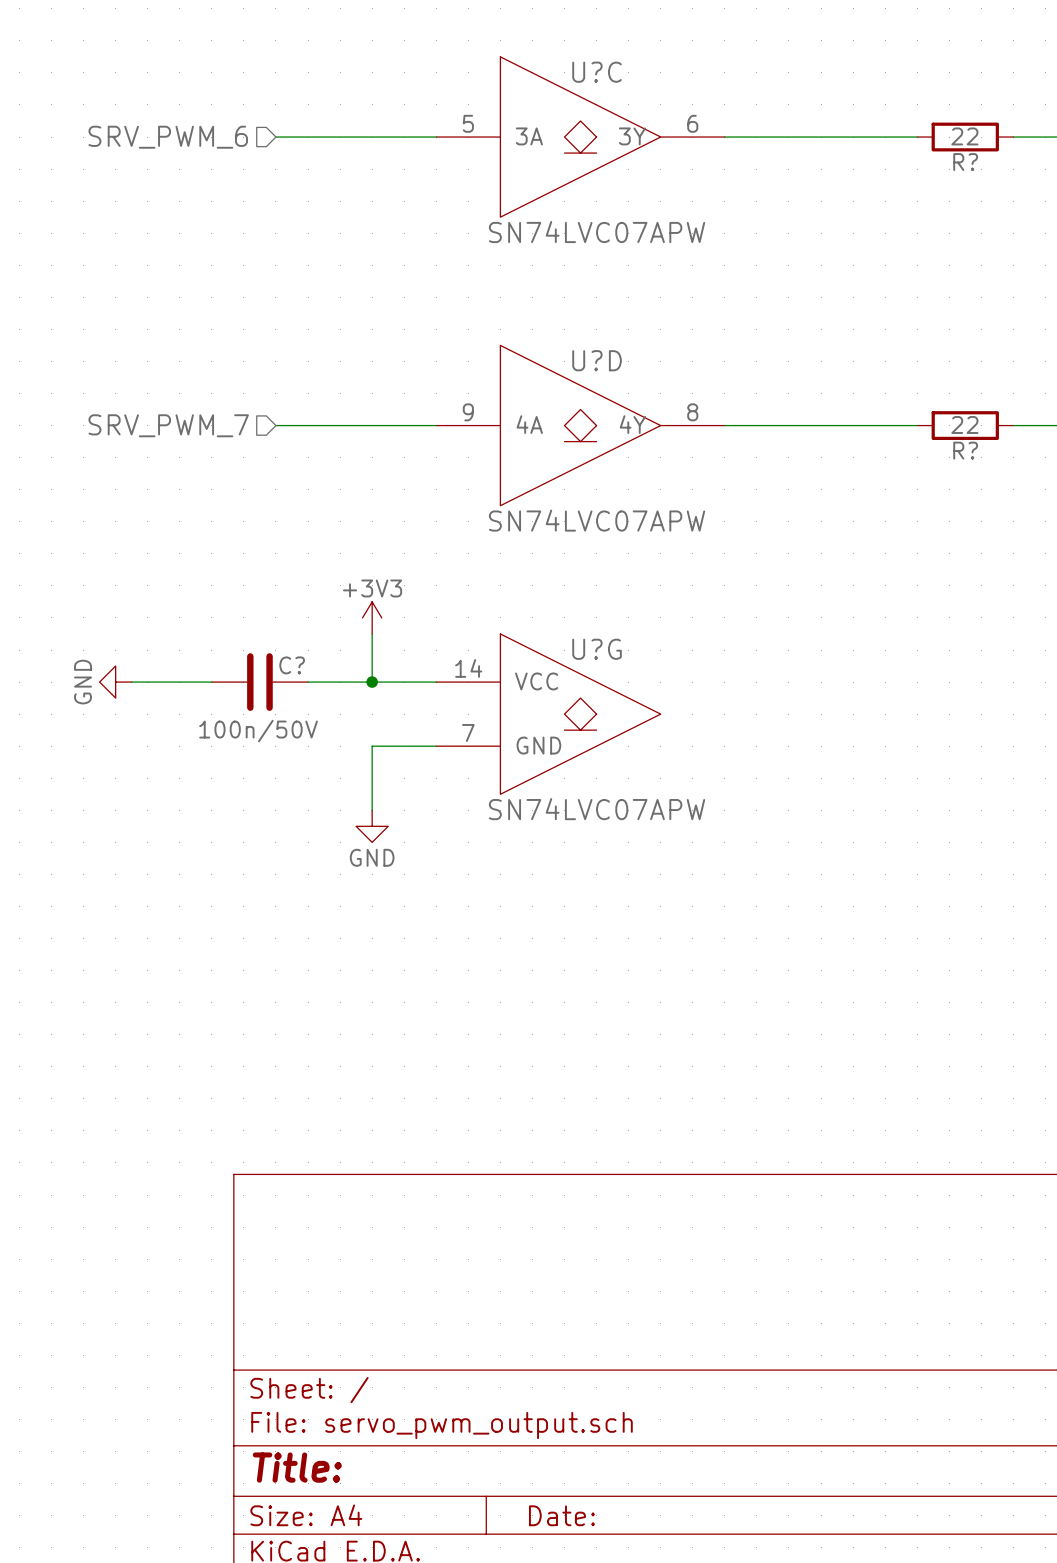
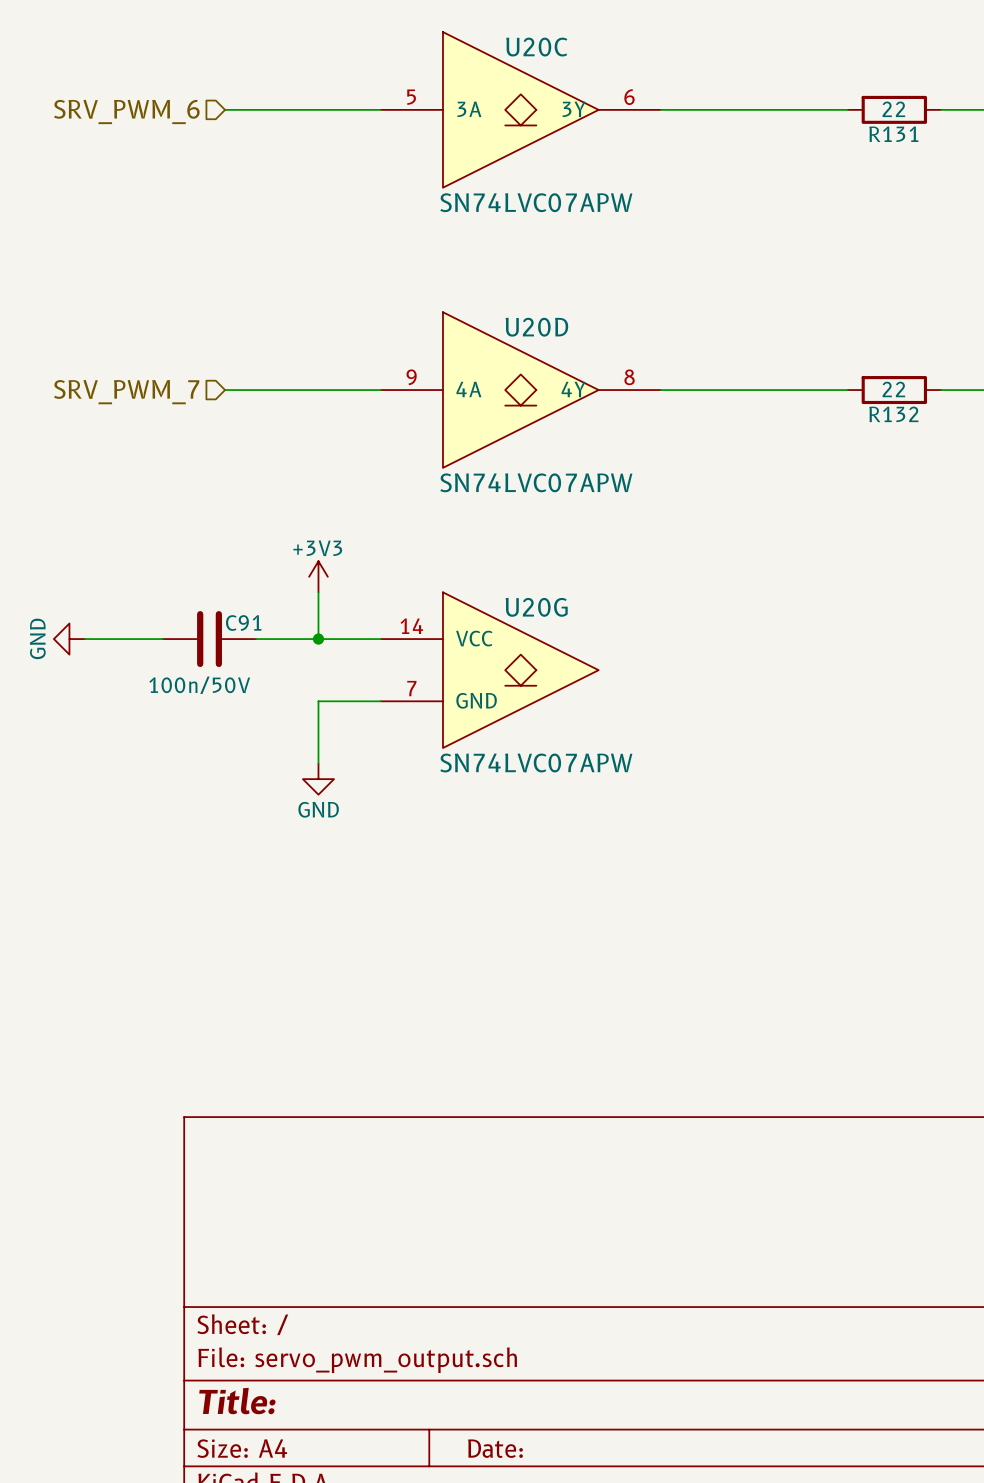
U?C name: U?C (597, 72) -> U20C (536, 47)
R? name: R? (965, 162) -> R131 (893, 134)
U?D name: U?D (597, 360) -> U20D (536, 327)
R? name: R? (965, 450) -> R132 (893, 414)
U?G name: U?G (597, 649) -> U20G (536, 607)
C? name: C? (292, 665) -> C91 (243, 622)

